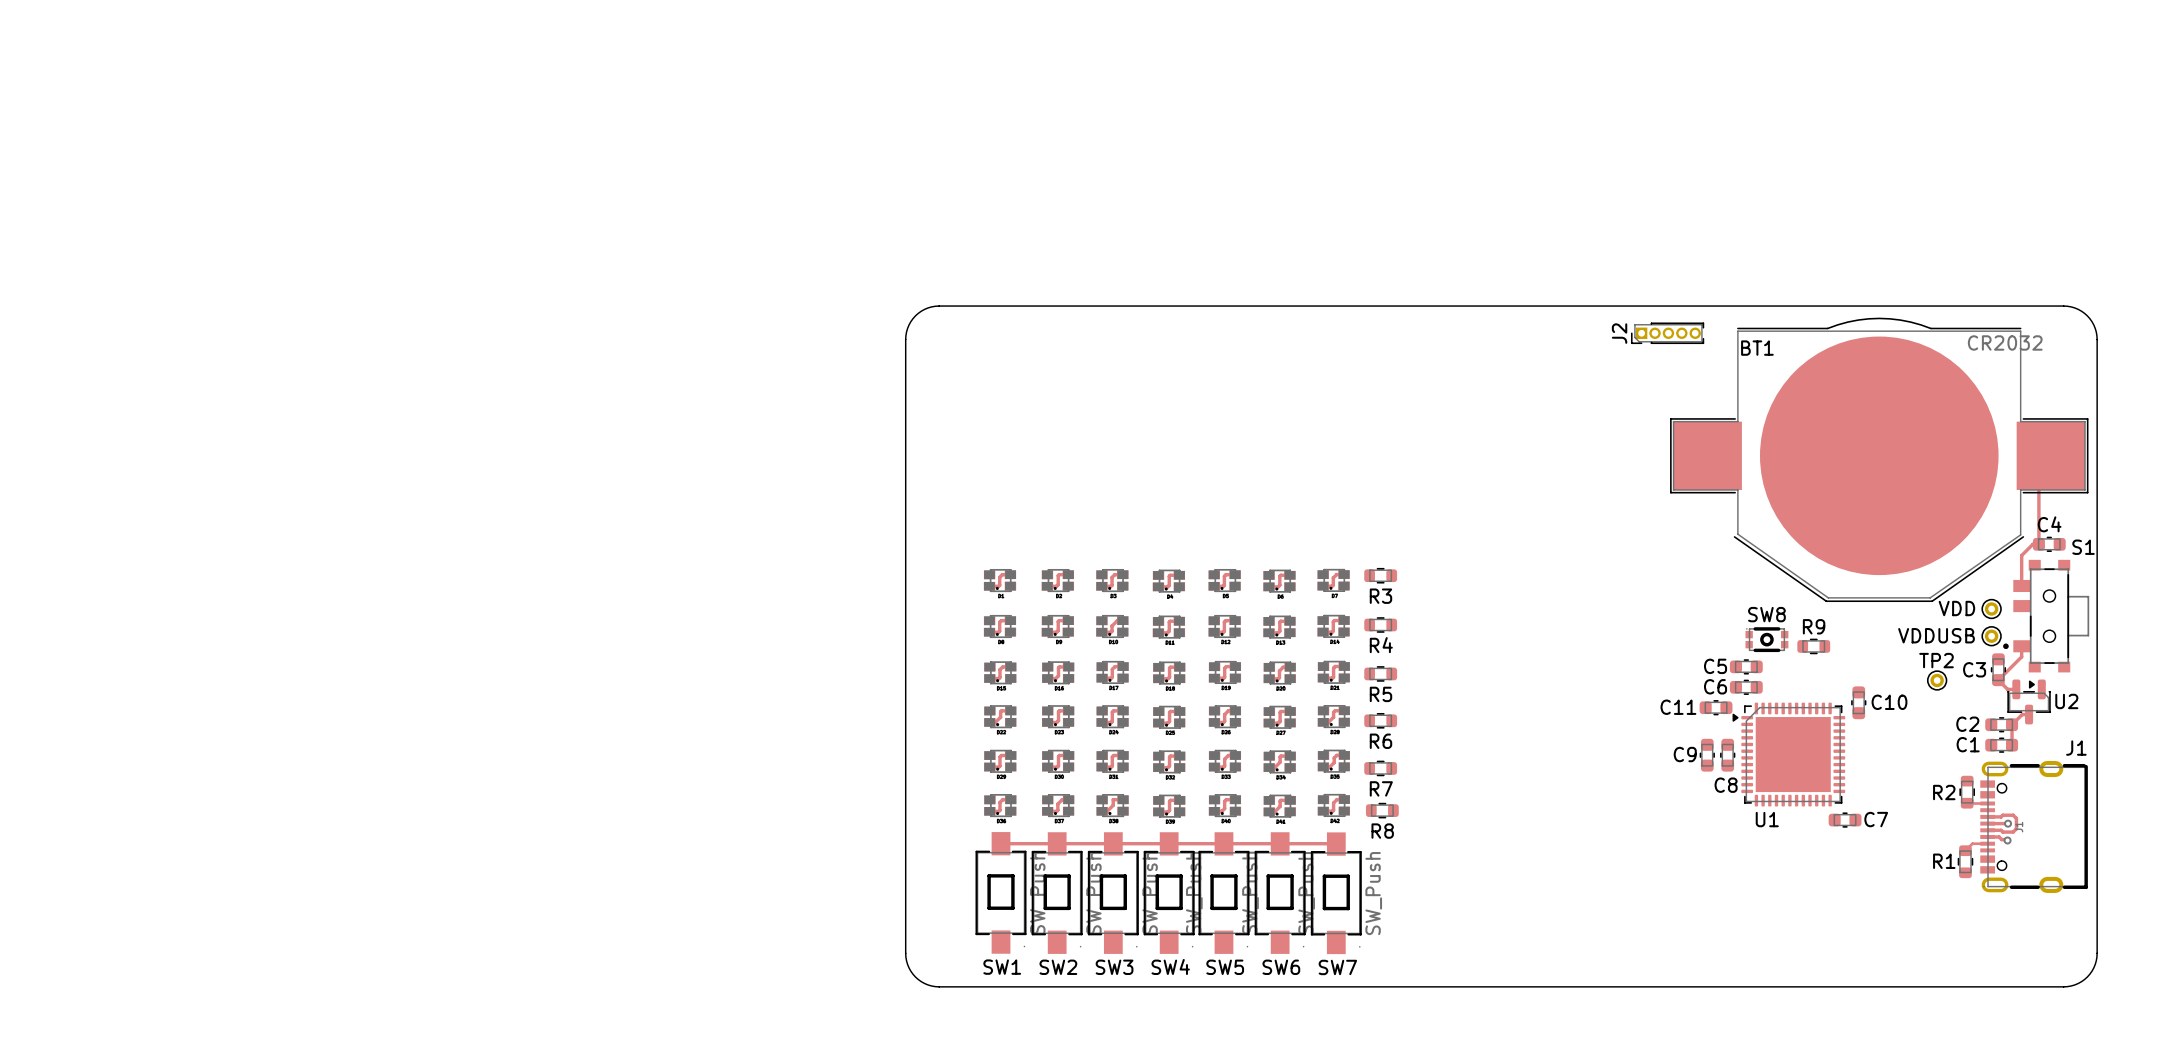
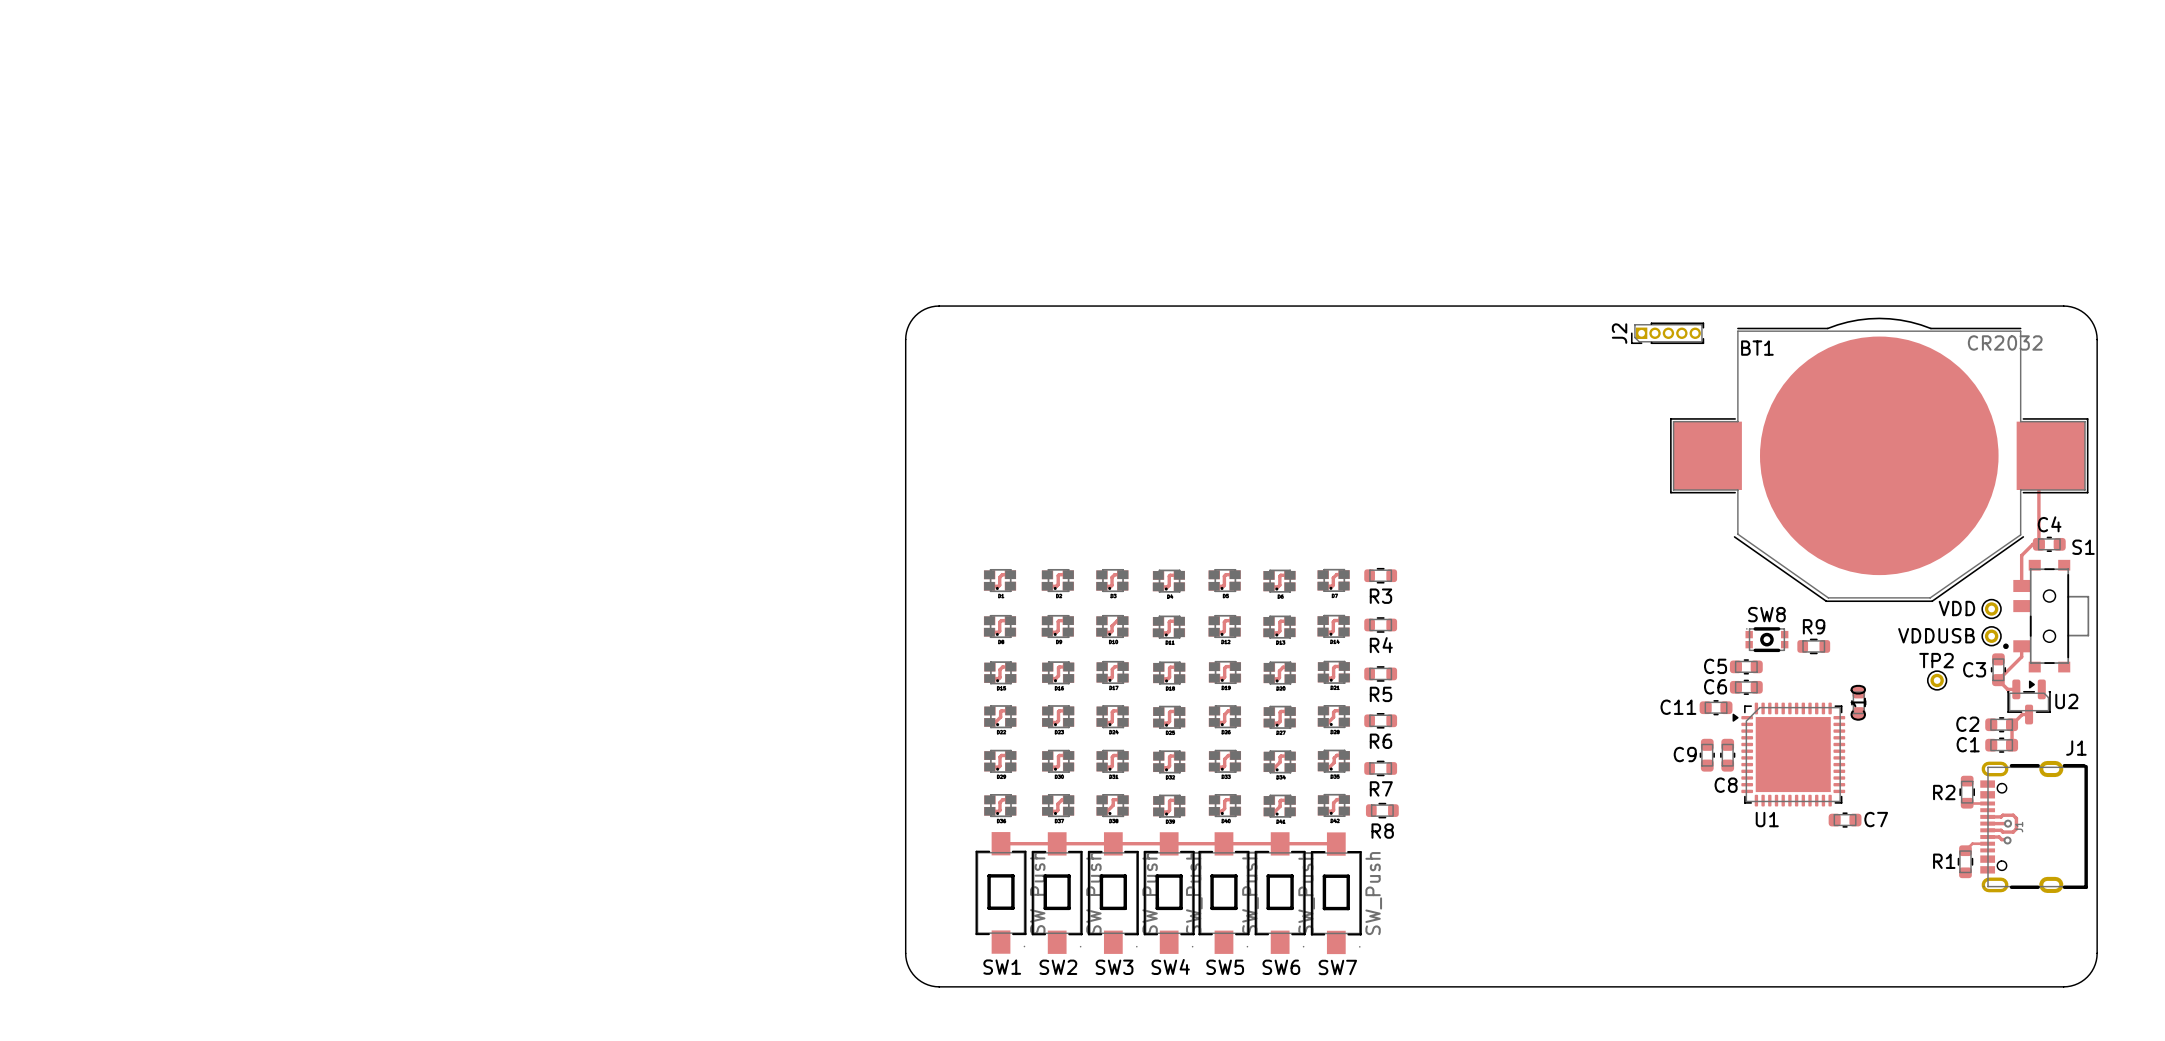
C10 name rotation: 0° (1889, 702) -> 90° counterclockwise (1858, 702)

